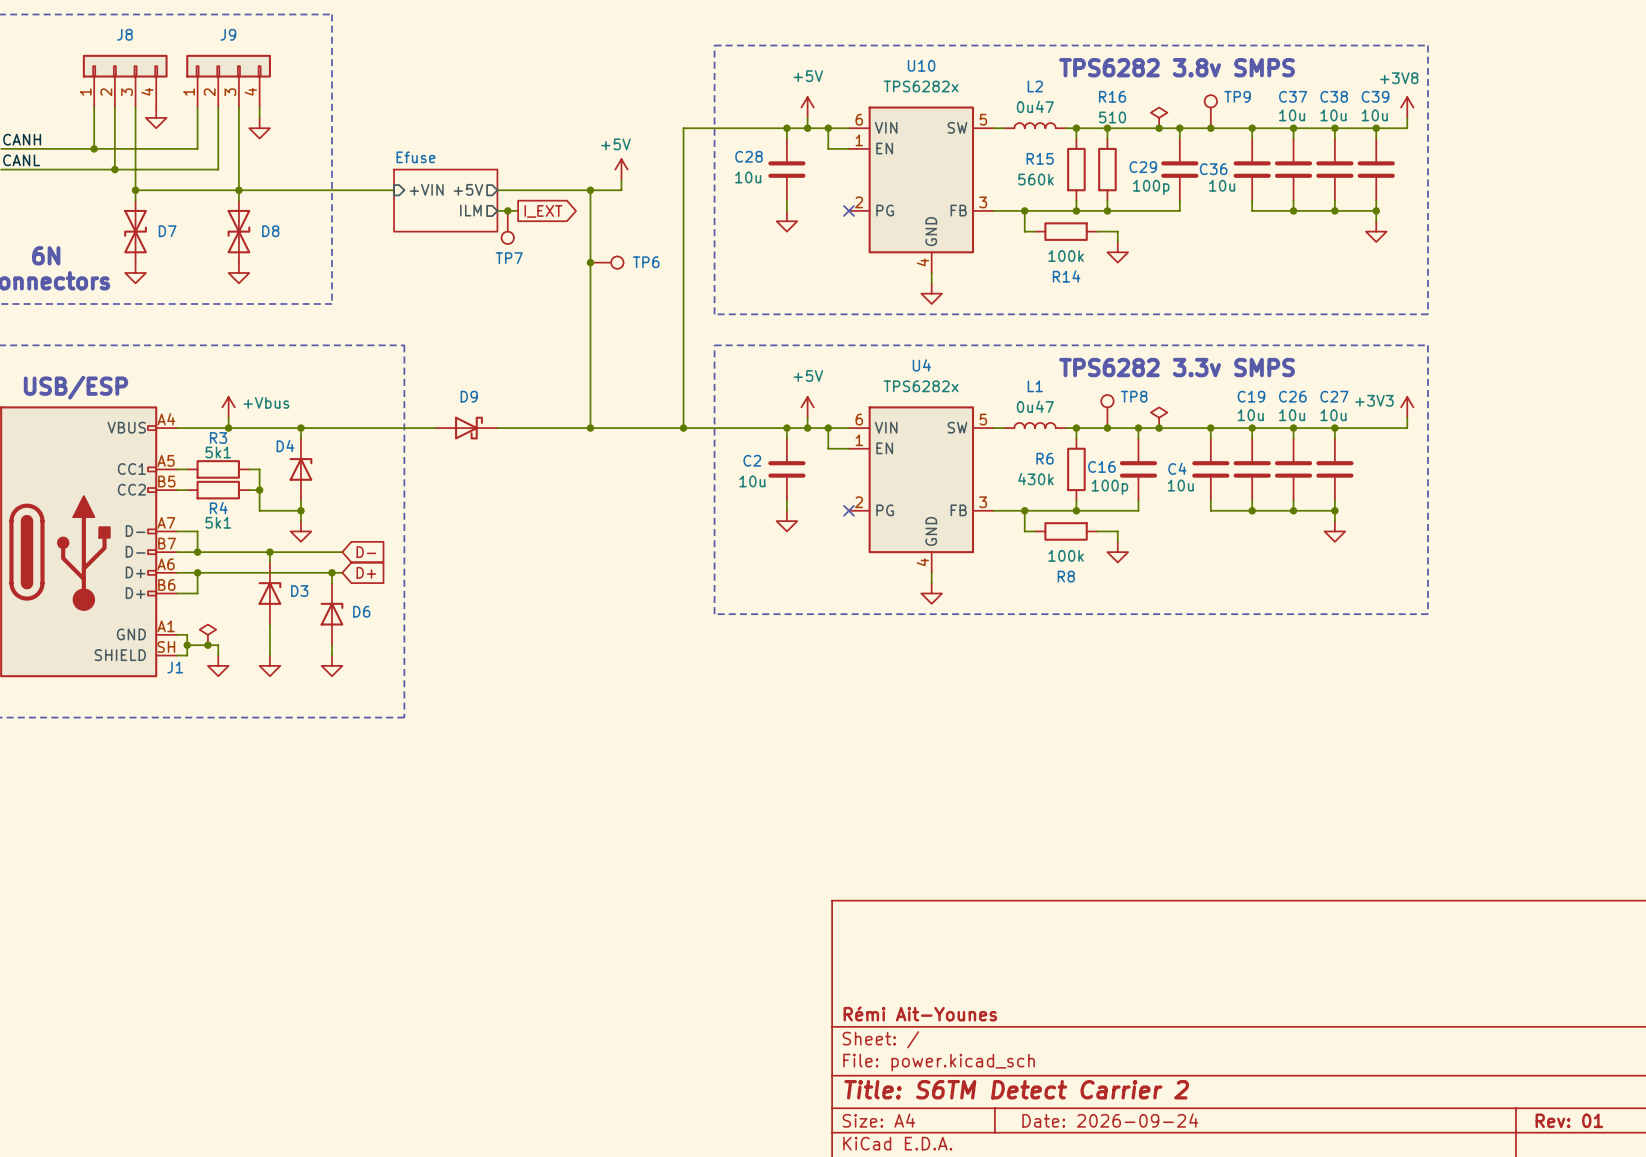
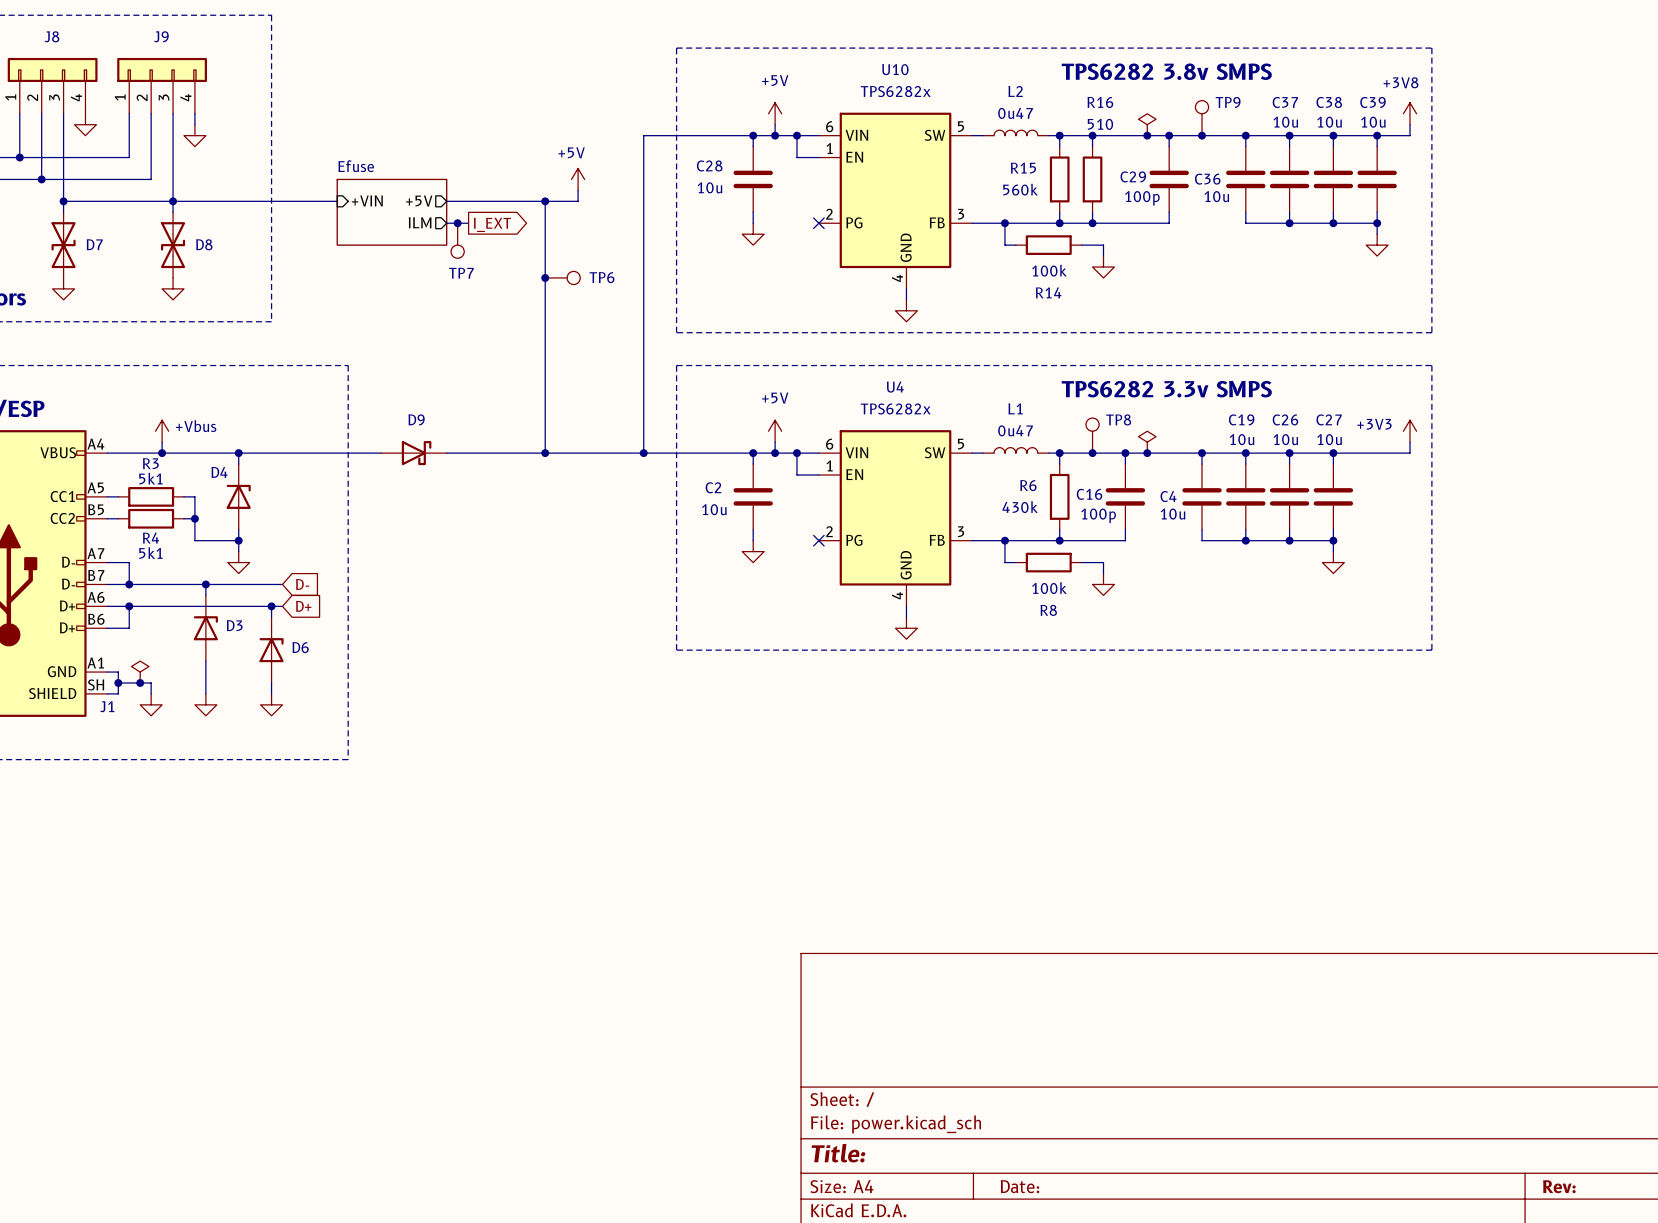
title block: Rémi Ait-Younes (920, 1013) -> none
title block: Title: S6TM Detect Carrier 2 (1016, 1089) -> Title: (838, 1153)
title block: Date: 2026-09-24 (1110, 1120) -> Date: (1019, 1186)
title block: Rev: 01 (1569, 1120) -> Rev: (1559, 1186)

